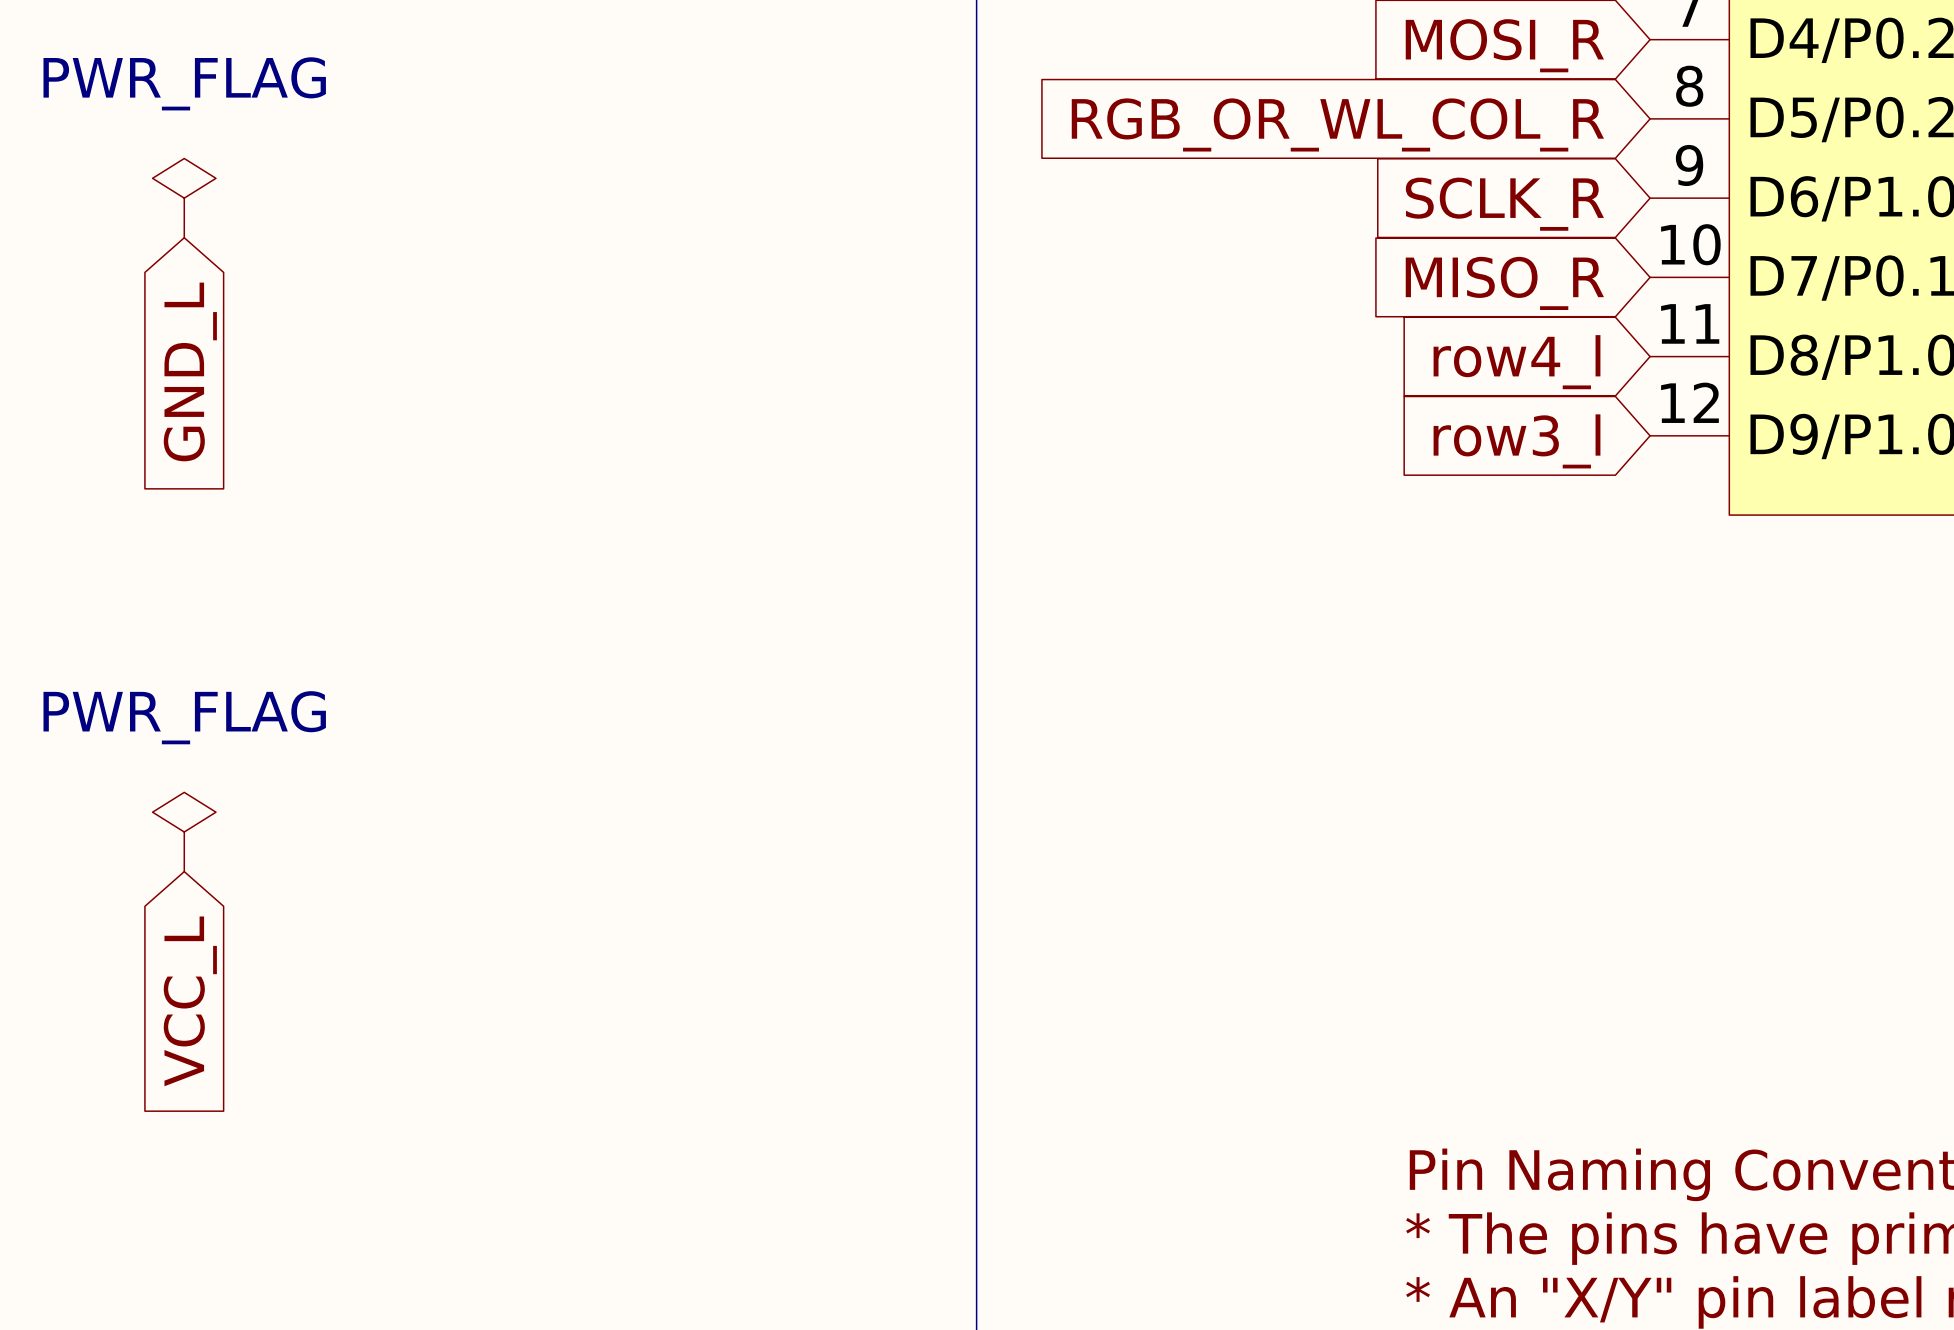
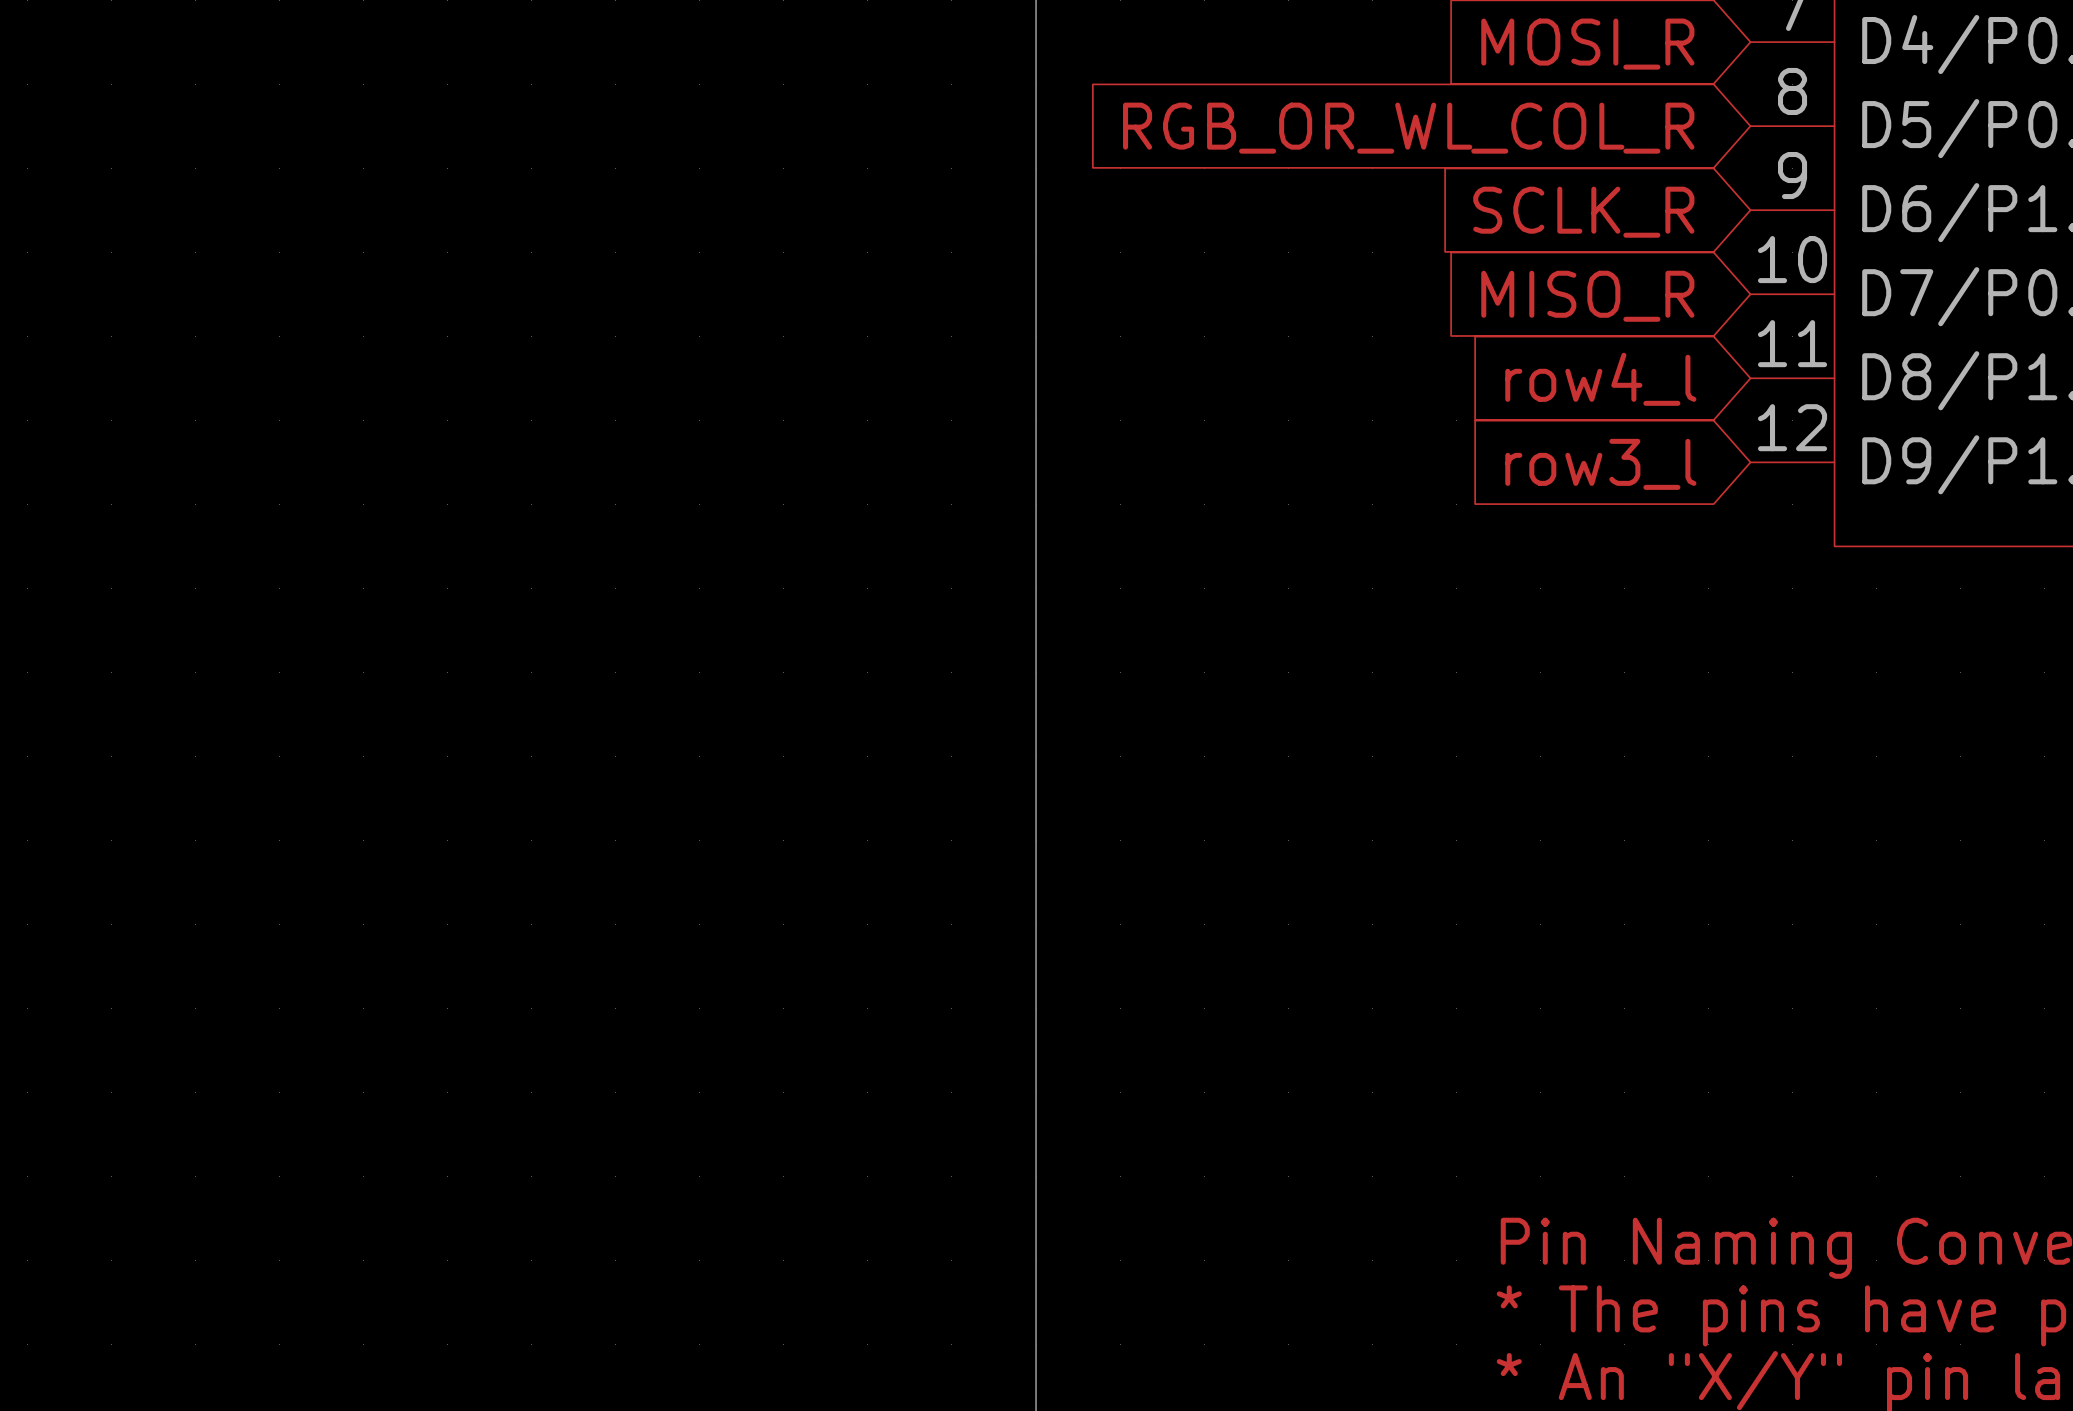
power symbol: PWR_FLAG (184, 198) -> none
global label: GND_L (190, 371) -> none
power symbol: PWR_FLAG (184, 832) -> none
global label: VCC_L (190, 1001) -> none

